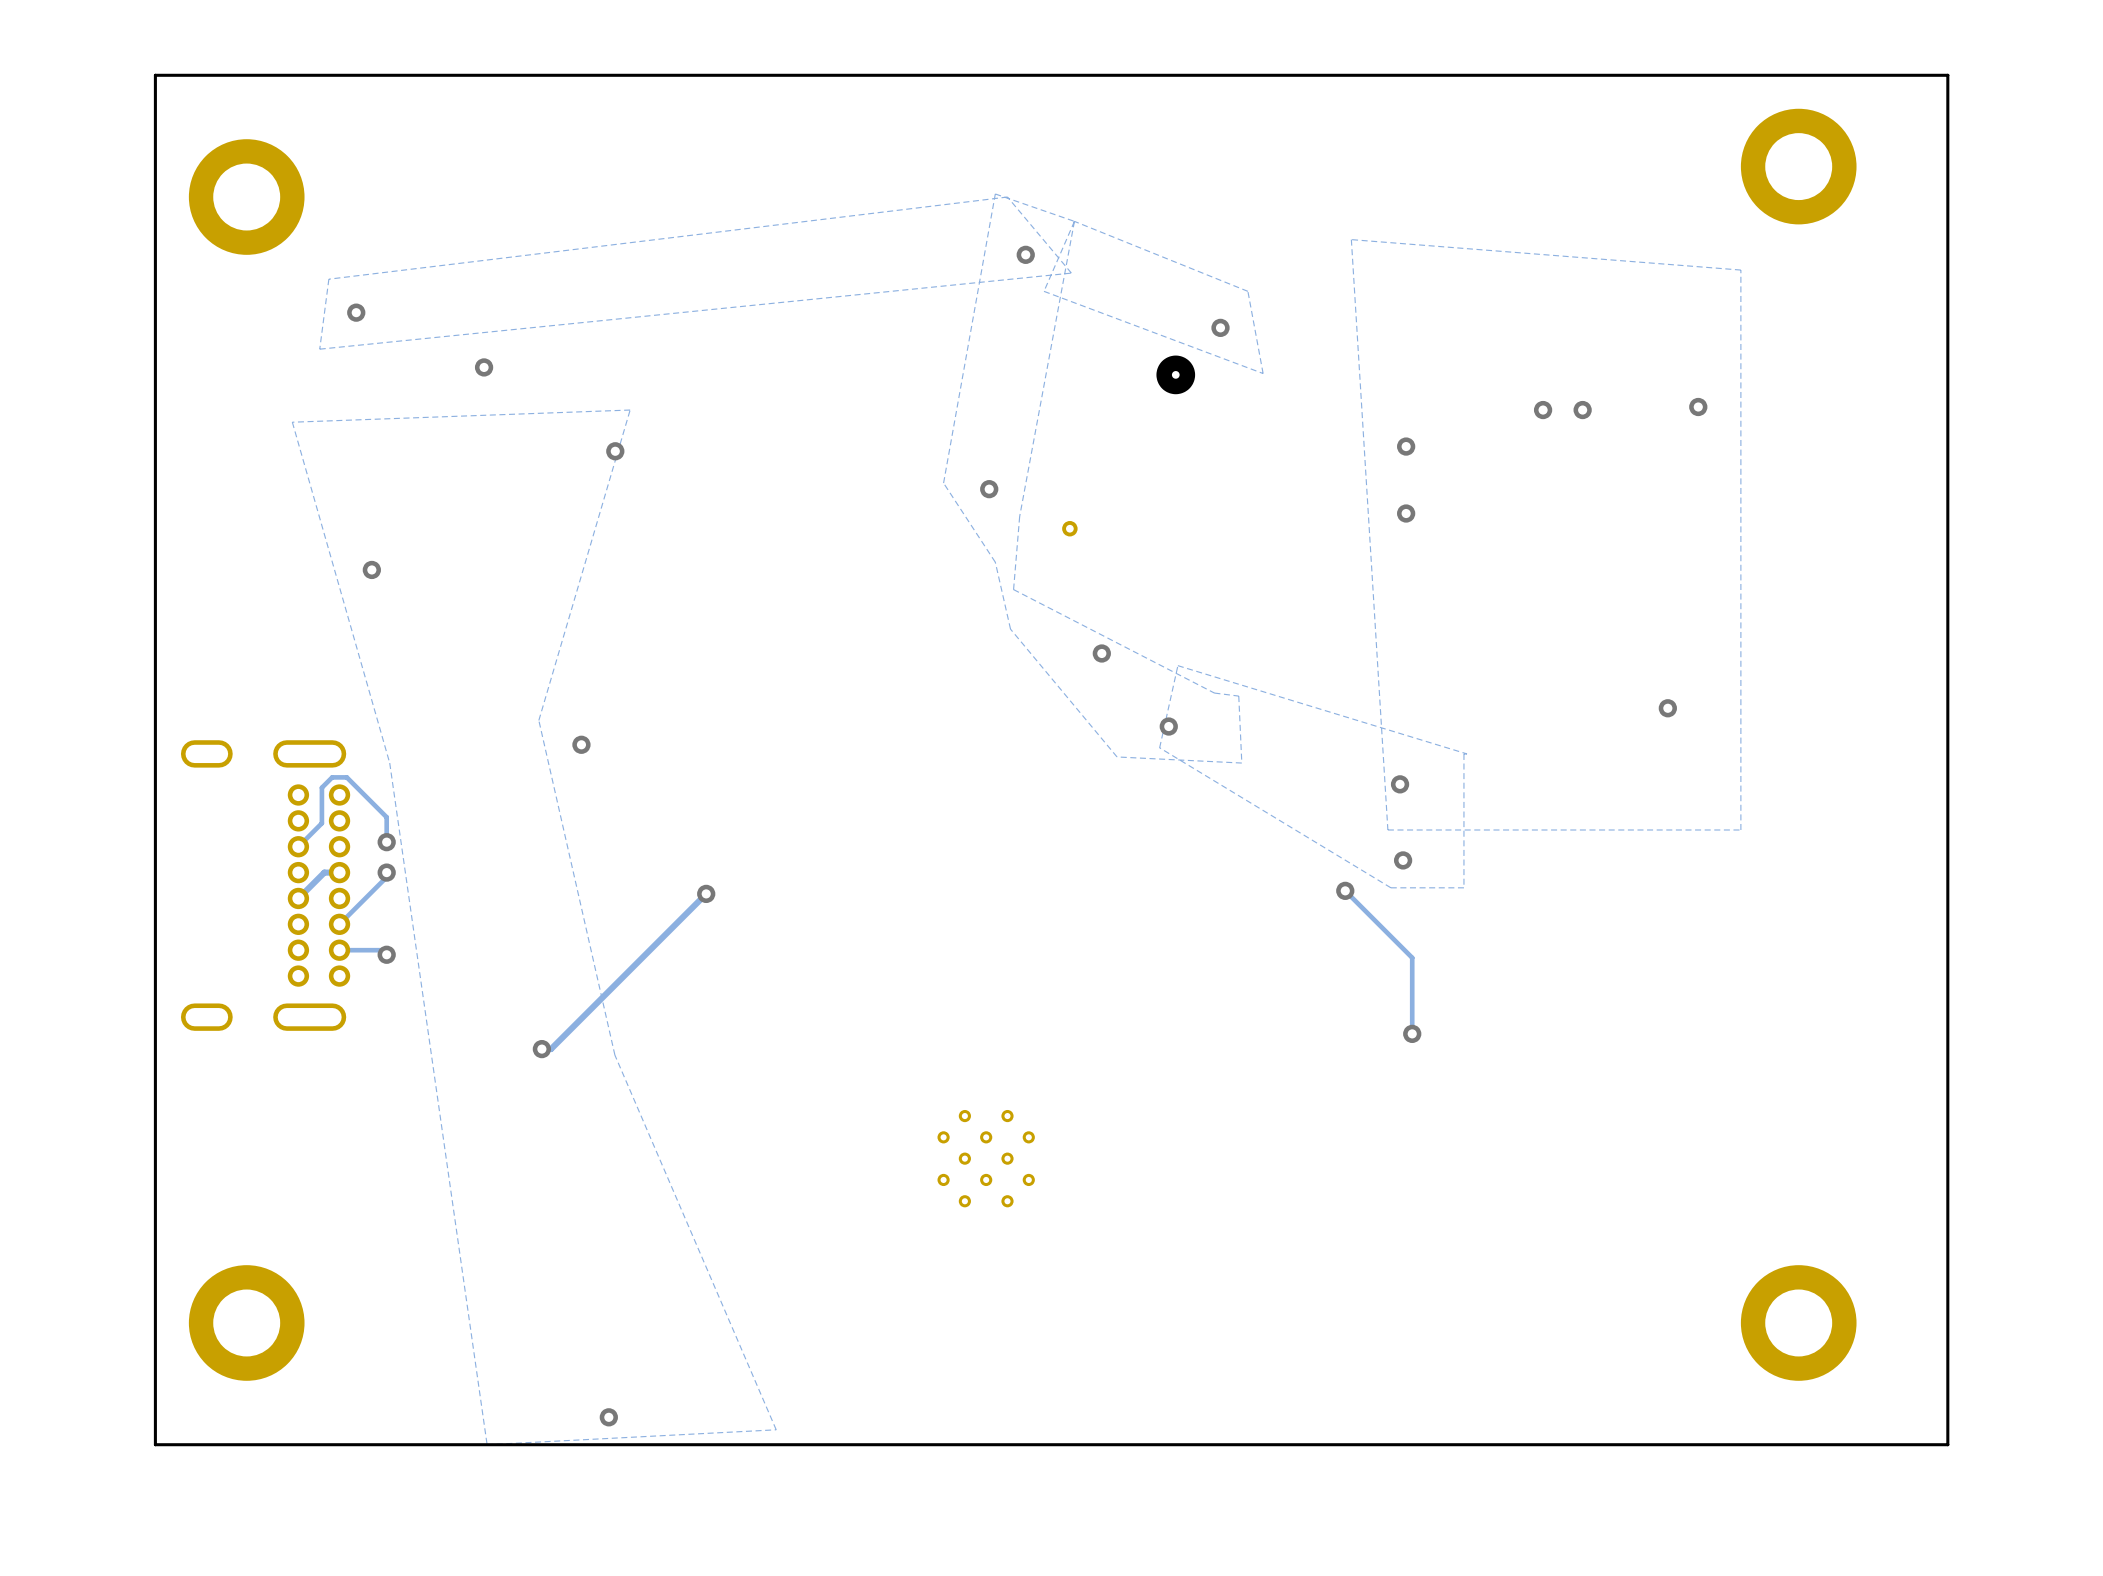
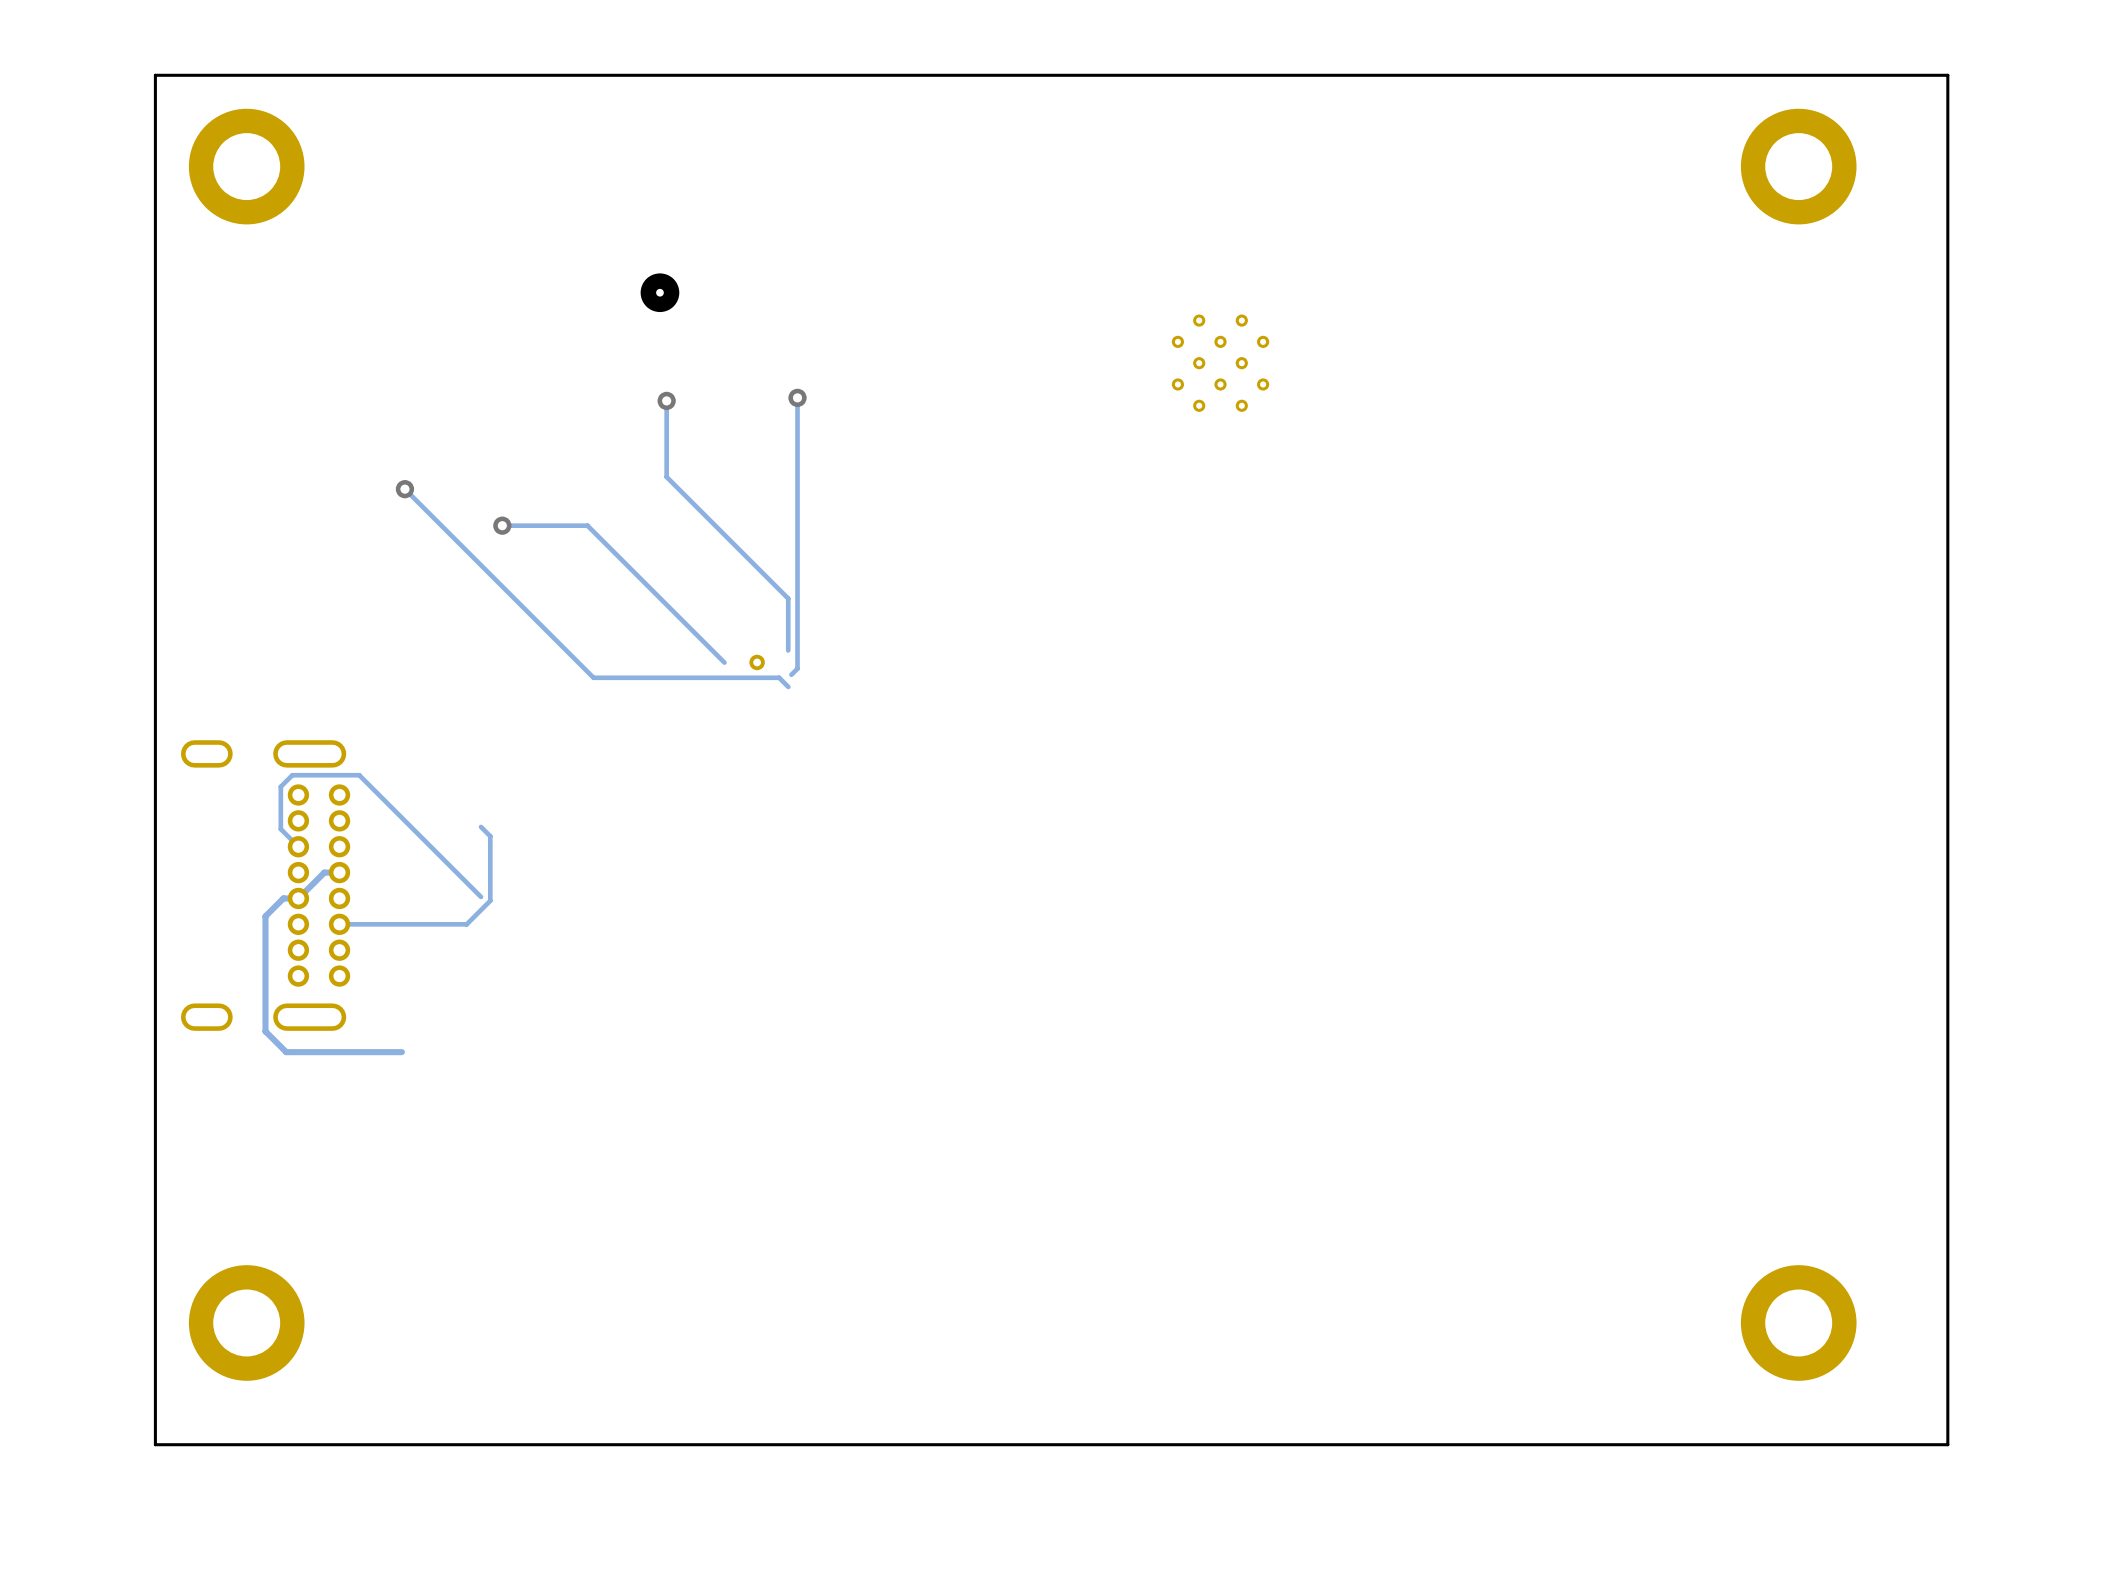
part position: (246, 197) -> (246, 166)
zone outline: (1007, 197) (328, 279) (319, 349) (1071, 273) (1007, 197) -> none
zone outline: (1074, 221) (995, 193) (943, 483) (995, 562) (1010, 629) (1117, 756) (1241, 763) (1238, 696) (1214, 693) (1013, 589) (1019, 516) (1074, 221) -> none
zone outline: (1074, 221) (1247, 291) (1263, 373) (1044, 291) (1074, 221) -> none
zone outline: (1351, 239) (1740, 270) (1740, 829) (1387, 829) (1351, 239) -> none
via: (1025, 254) -> none
via: (356, 312) -> none
via: (1220, 327) -> none
part: none -> (1220, 363)
via: (484, 367) -> none
part position: (1175, 374) -> (659, 292)
track: none -> (797, 397) (797, 668) (791, 674)
via: none -> (797, 397)
track: none -> (666, 400) (666, 476) (788, 598) (788, 650)
via: none -> (666, 400)
via: (1698, 407) -> none
zone outline: (630, 410) (538, 720) (614, 1055) (776, 1429) (487, 1444) (389, 763) (292, 422) (630, 410) -> none
via: (1543, 410) -> none
via: (1582, 410) -> none
via: (1406, 446) -> none
via: (615, 451) -> none
track: none -> (404, 489) (593, 677) (779, 677) (788, 686)
via: none -> (404, 489)
via: (989, 489) -> none
via: (1406, 513) -> none
track: none -> (502, 525) (587, 525) (724, 662)
via: none -> (502, 525)
part position: (1069, 528) -> (757, 662)
via: (371, 569) -> none
via: (1101, 653) -> none
zone outline: (1177, 665) (1159, 747) (1390, 887) (1463, 887) (1463, 753) (1467, 753) (1177, 665) -> none
via: (1667, 708) -> none
via: (1168, 726) -> none
via: (581, 744) -> none
via: (1400, 784) -> none
track: (386, 842) (386, 817) (346, 777) (332, 777) (321, 787) (321, 823) (298, 846) -> (481, 896) (359, 775) (292, 775) (280, 786) (280, 829) (298, 846)
via: (386, 842) -> none
via: (1403, 860) -> none
track: (386, 872) (386, 877) (339, 924) -> (481, 826) (490, 836) (490, 900) (466, 924) (339, 924)
via: (386, 872) -> none
track: (1345, 890) (1412, 957) (1412, 1033) -> none
via: (1345, 890) -> none
track: (706, 893) (551, 1049) (541, 1049) -> none
via: (706, 893) -> none
track: none -> (298, 898) (283, 898) (265, 916) (265, 1031) (286, 1052) (401, 1052)
track: (339, 950) (382, 950) (386, 954) -> none
via: (386, 954) -> none
via: (1412, 1033) -> none
via: (541, 1049) -> none
part: (986, 1158) -> none
via: (608, 1417) -> none

